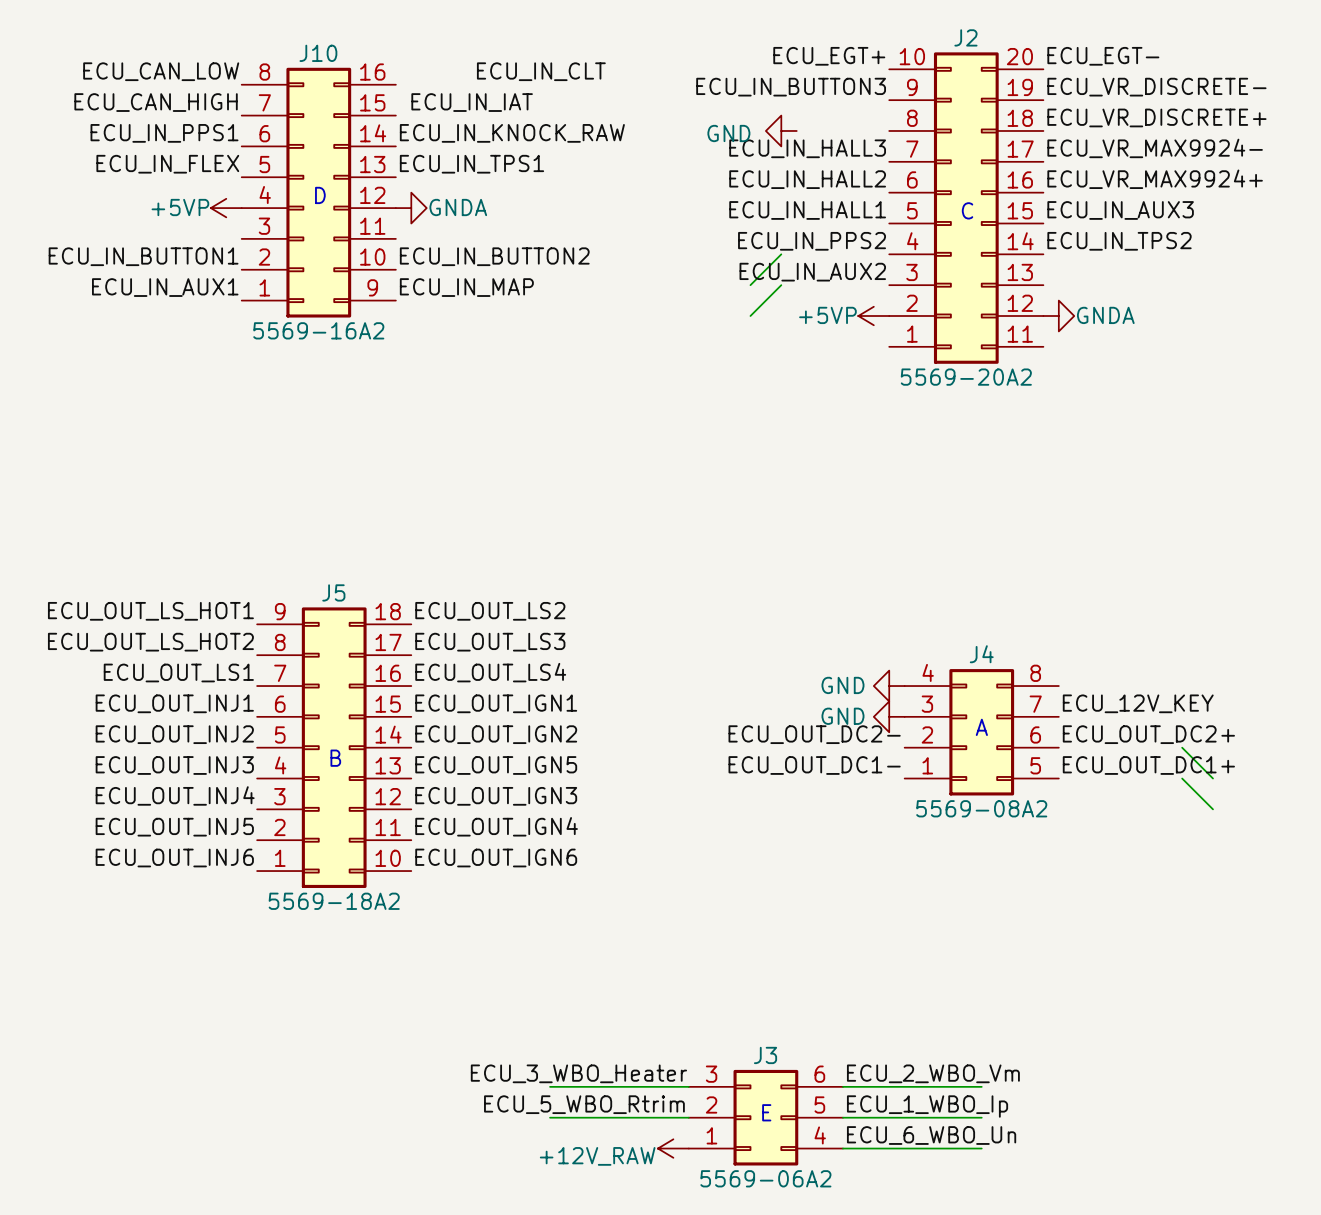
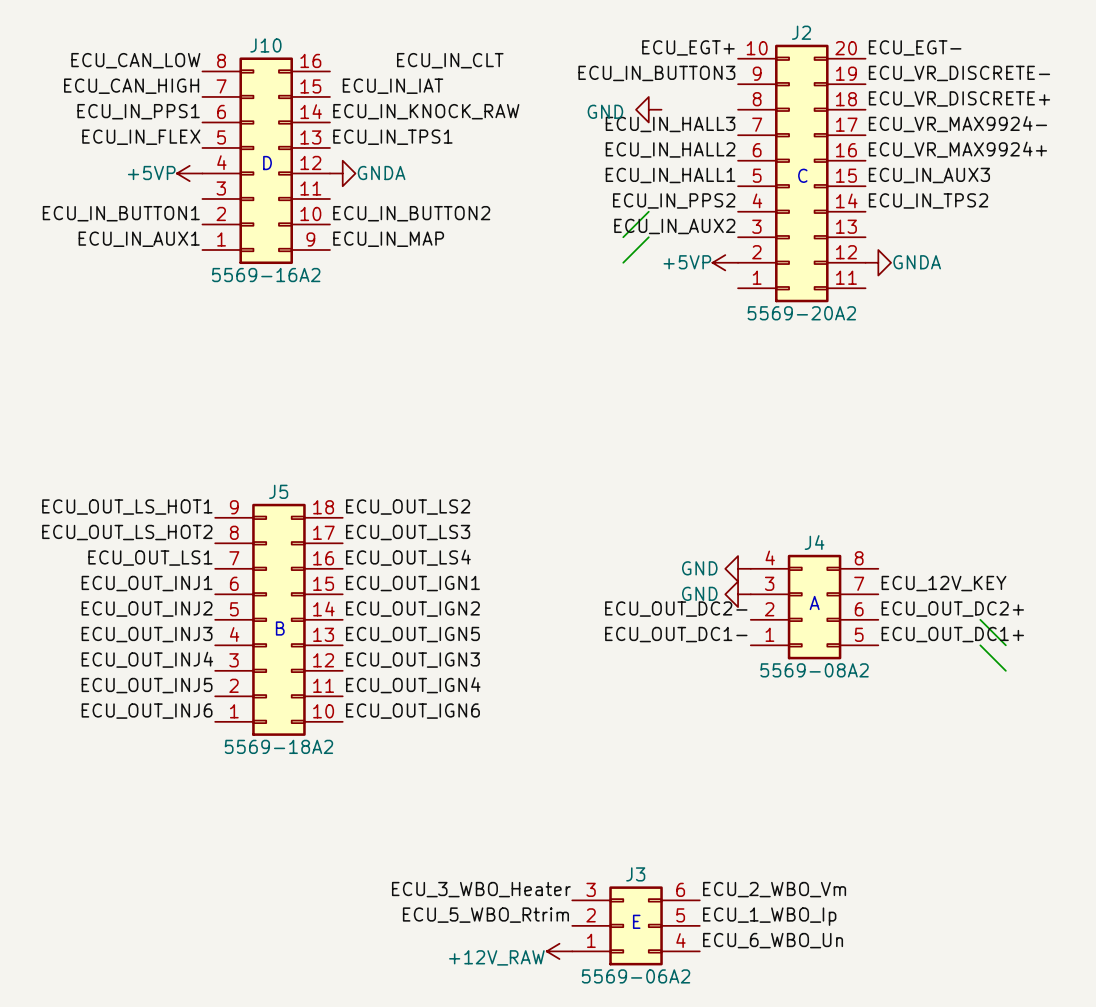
wire: (550, 1086) (688, 1086) -> none
wire: (842, 1086) (981, 1086) -> none
wire: (550, 1117) (688, 1117) -> none
wire: (842, 1117) (981, 1117) -> none
wire: (842, 1148) (981, 1148) -> none

